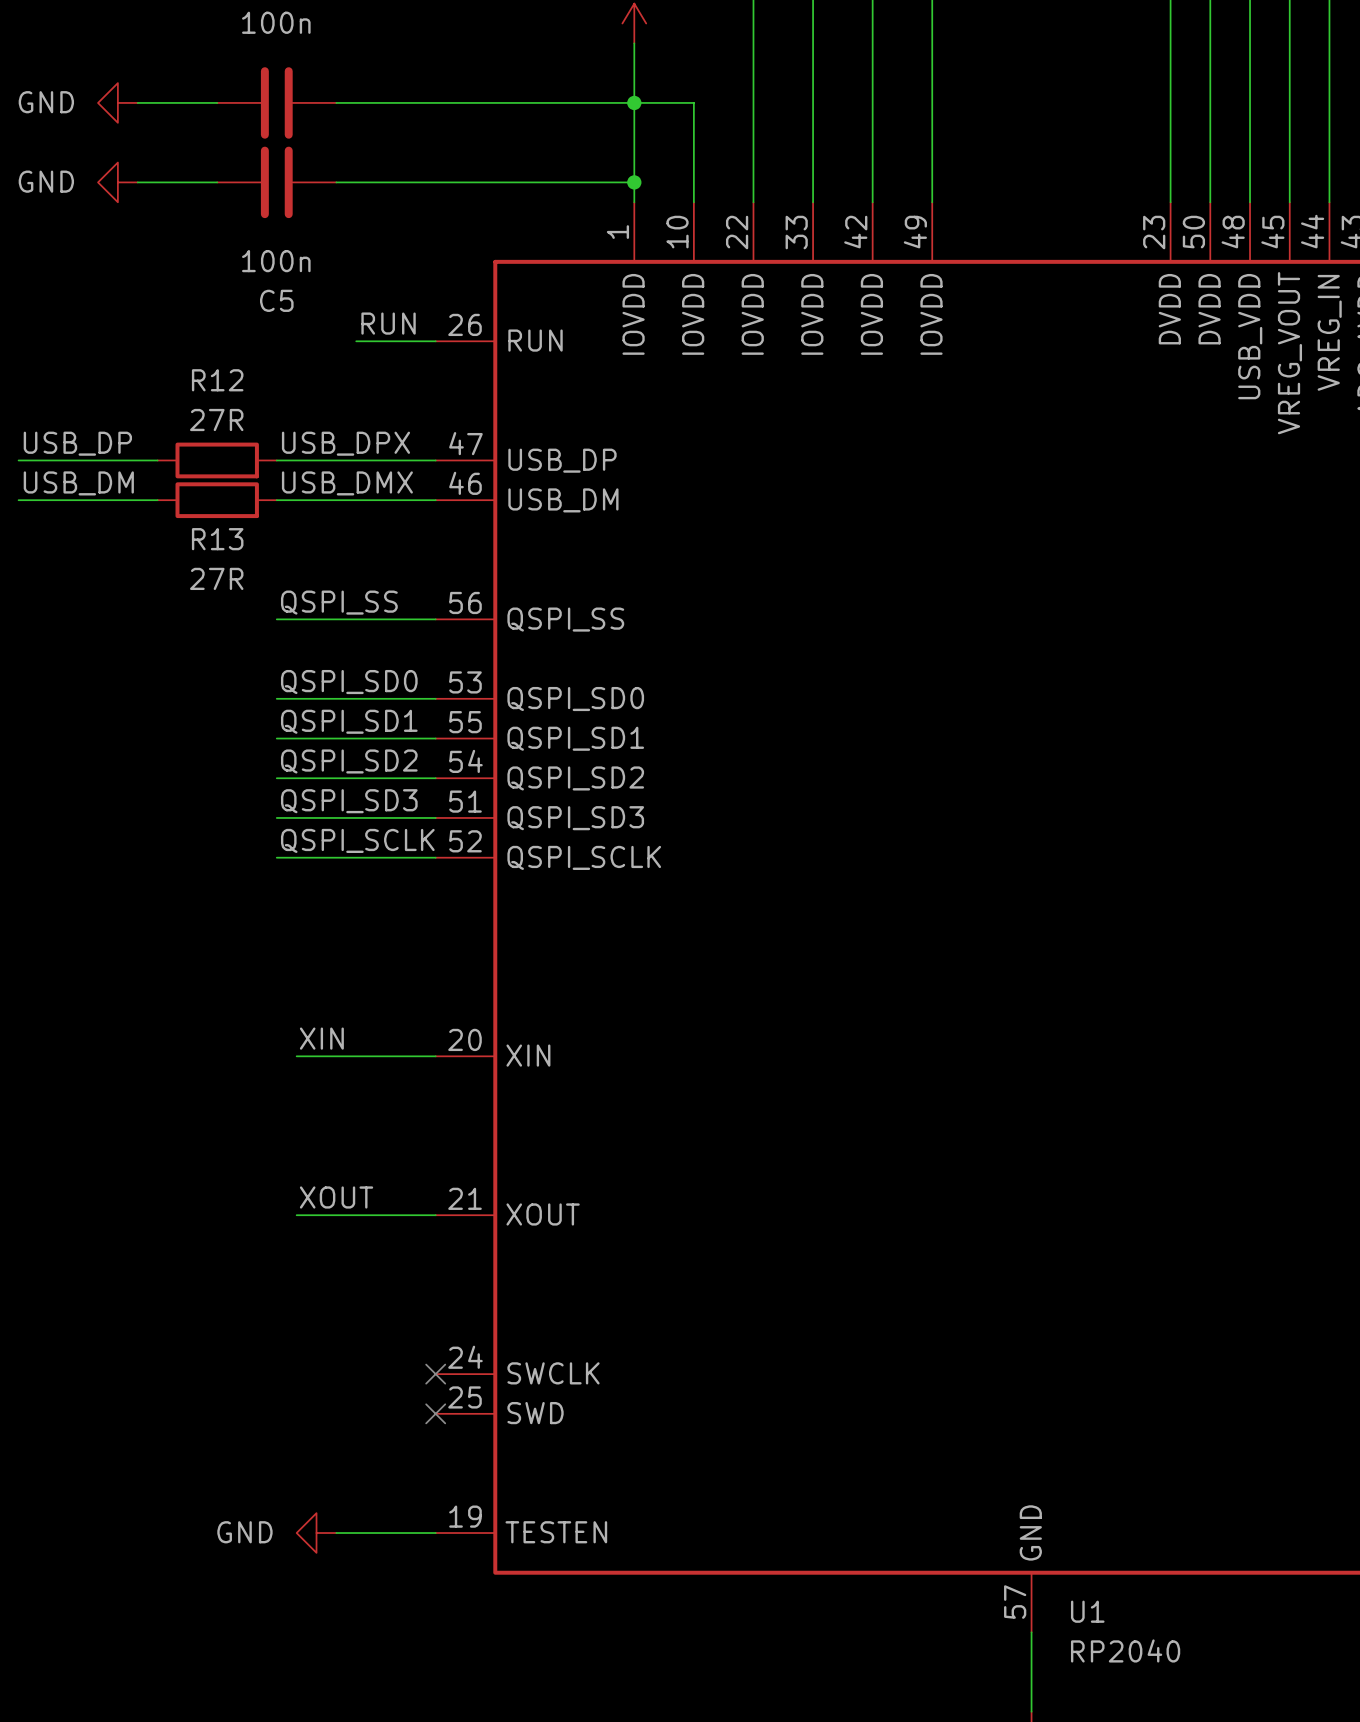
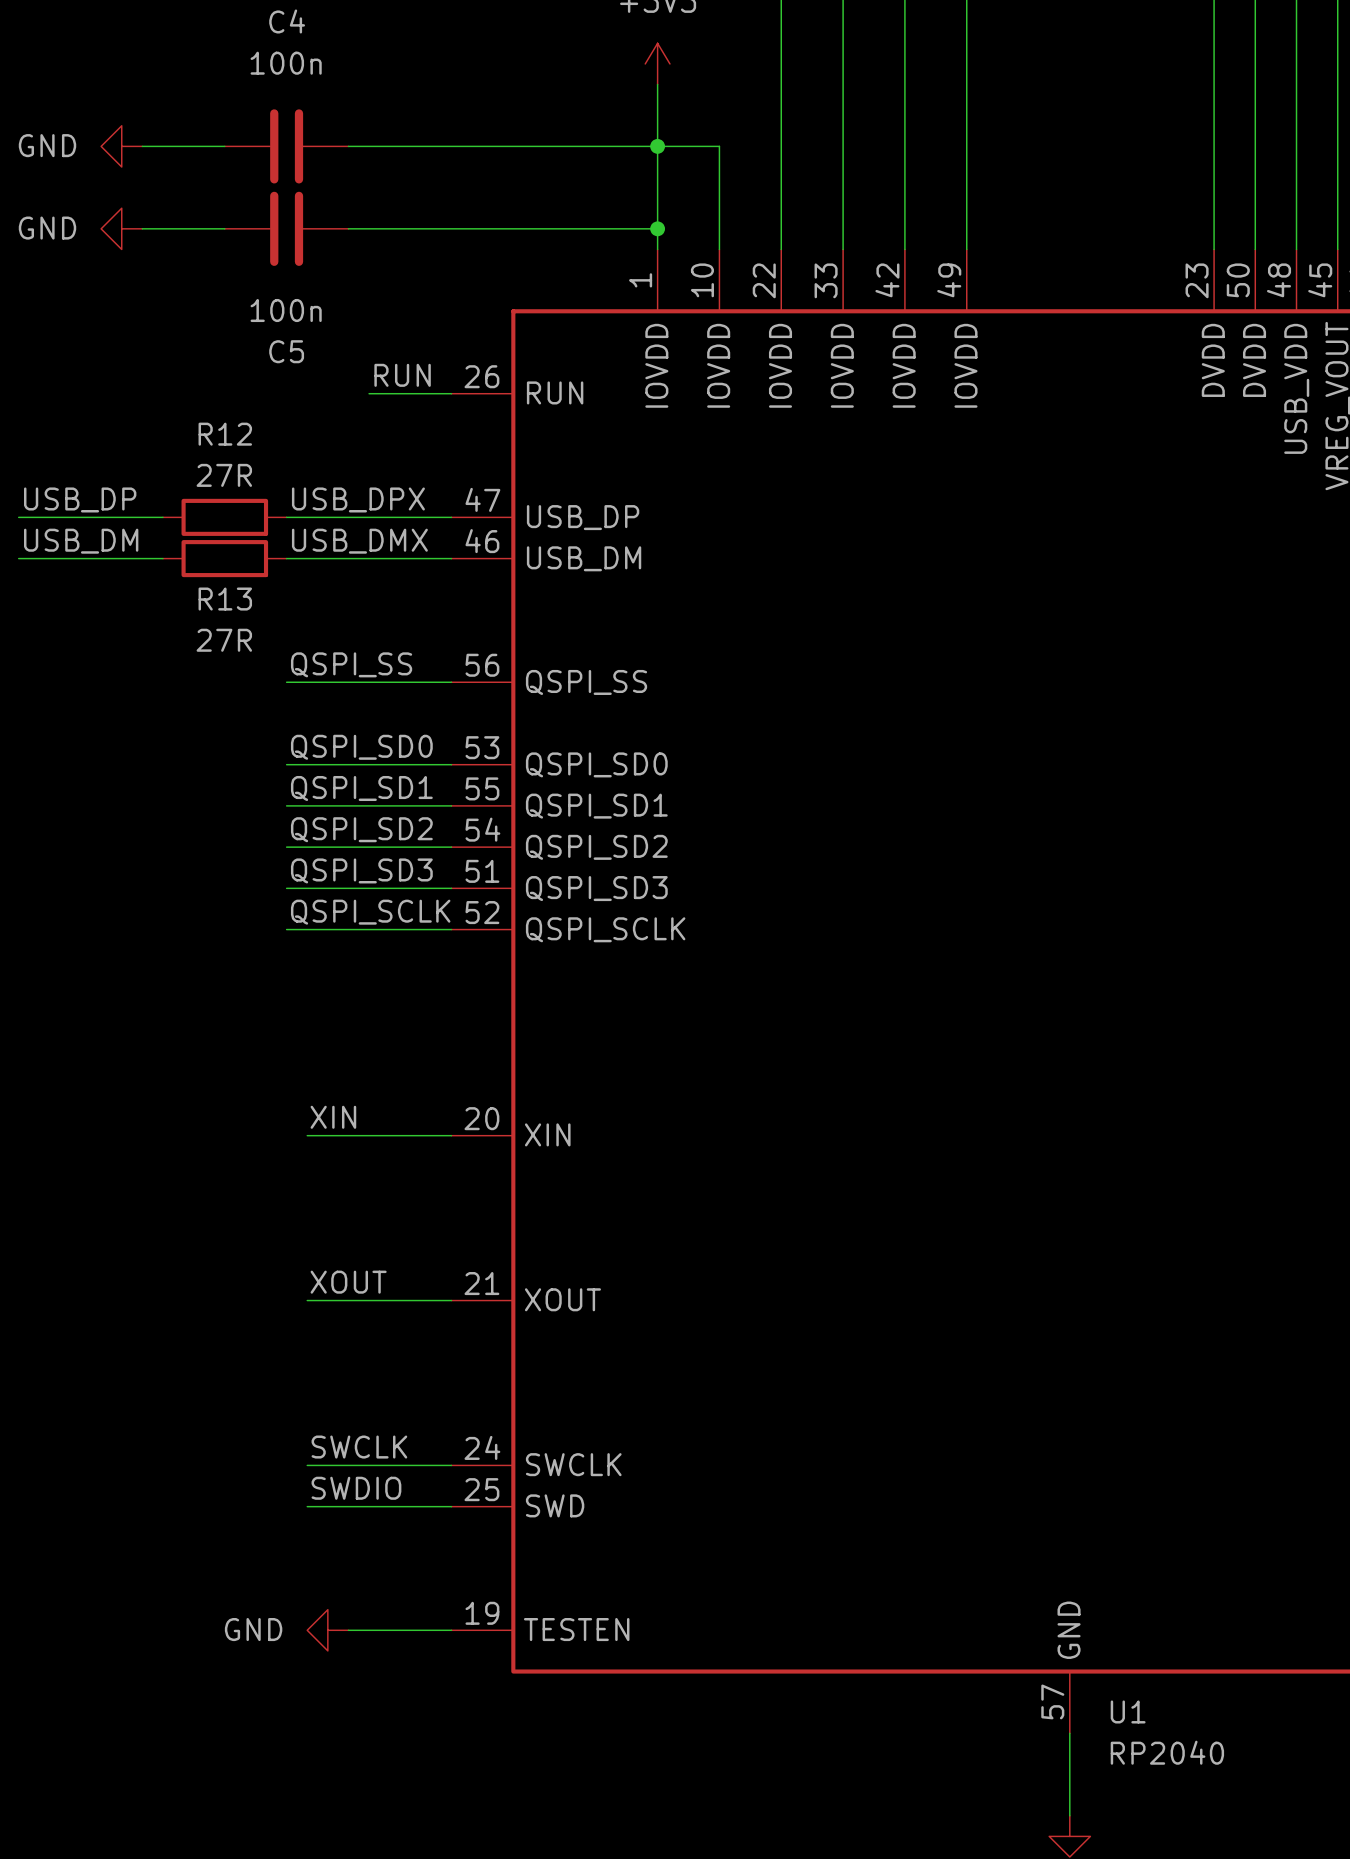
label: none -> SWCLK (359, 1447)
wire: none -> (307, 1465) (451, 1465)
no-connect mark: (435, 1374) -> none
label: none -> SWDIO (356, 1488)
wire: none -> (307, 1506) (451, 1506)
no-connect mark: (435, 1413) -> none

